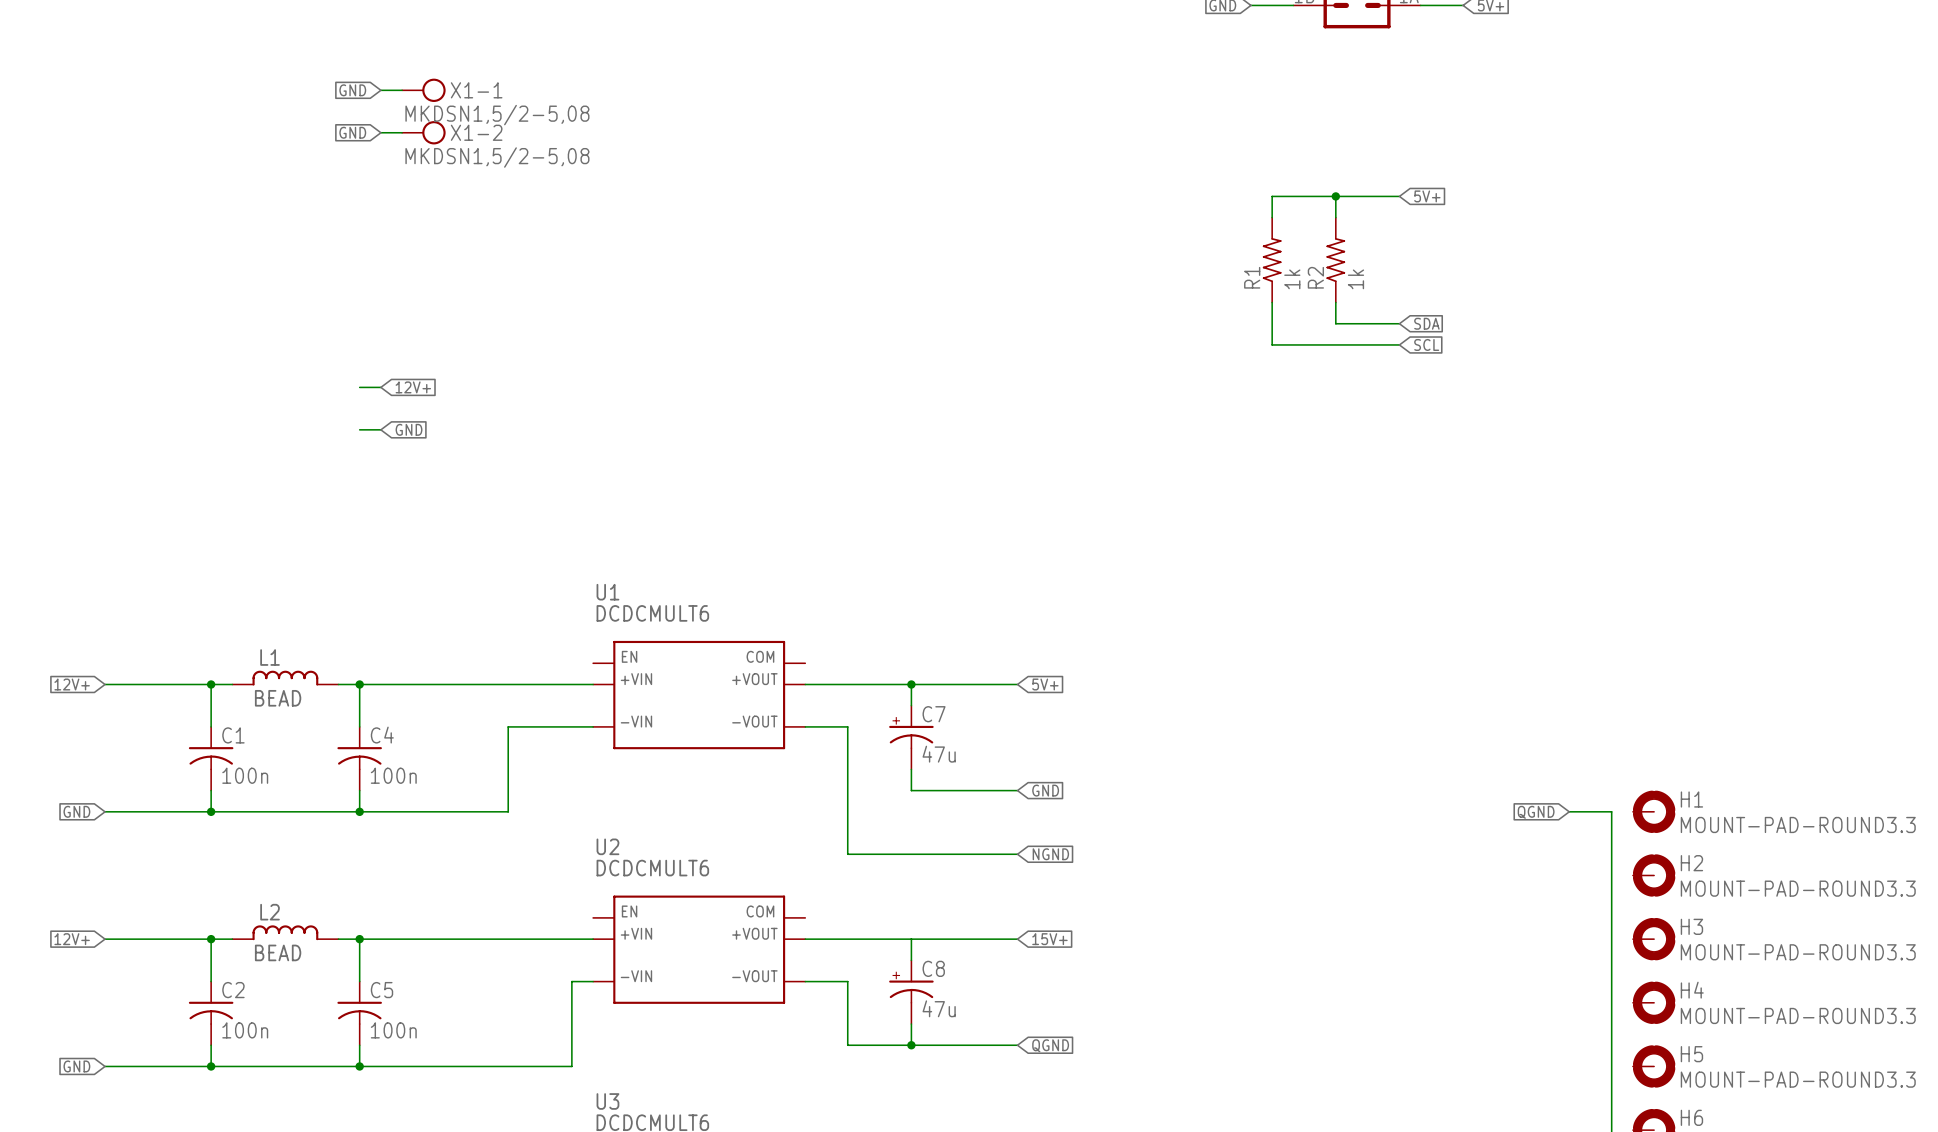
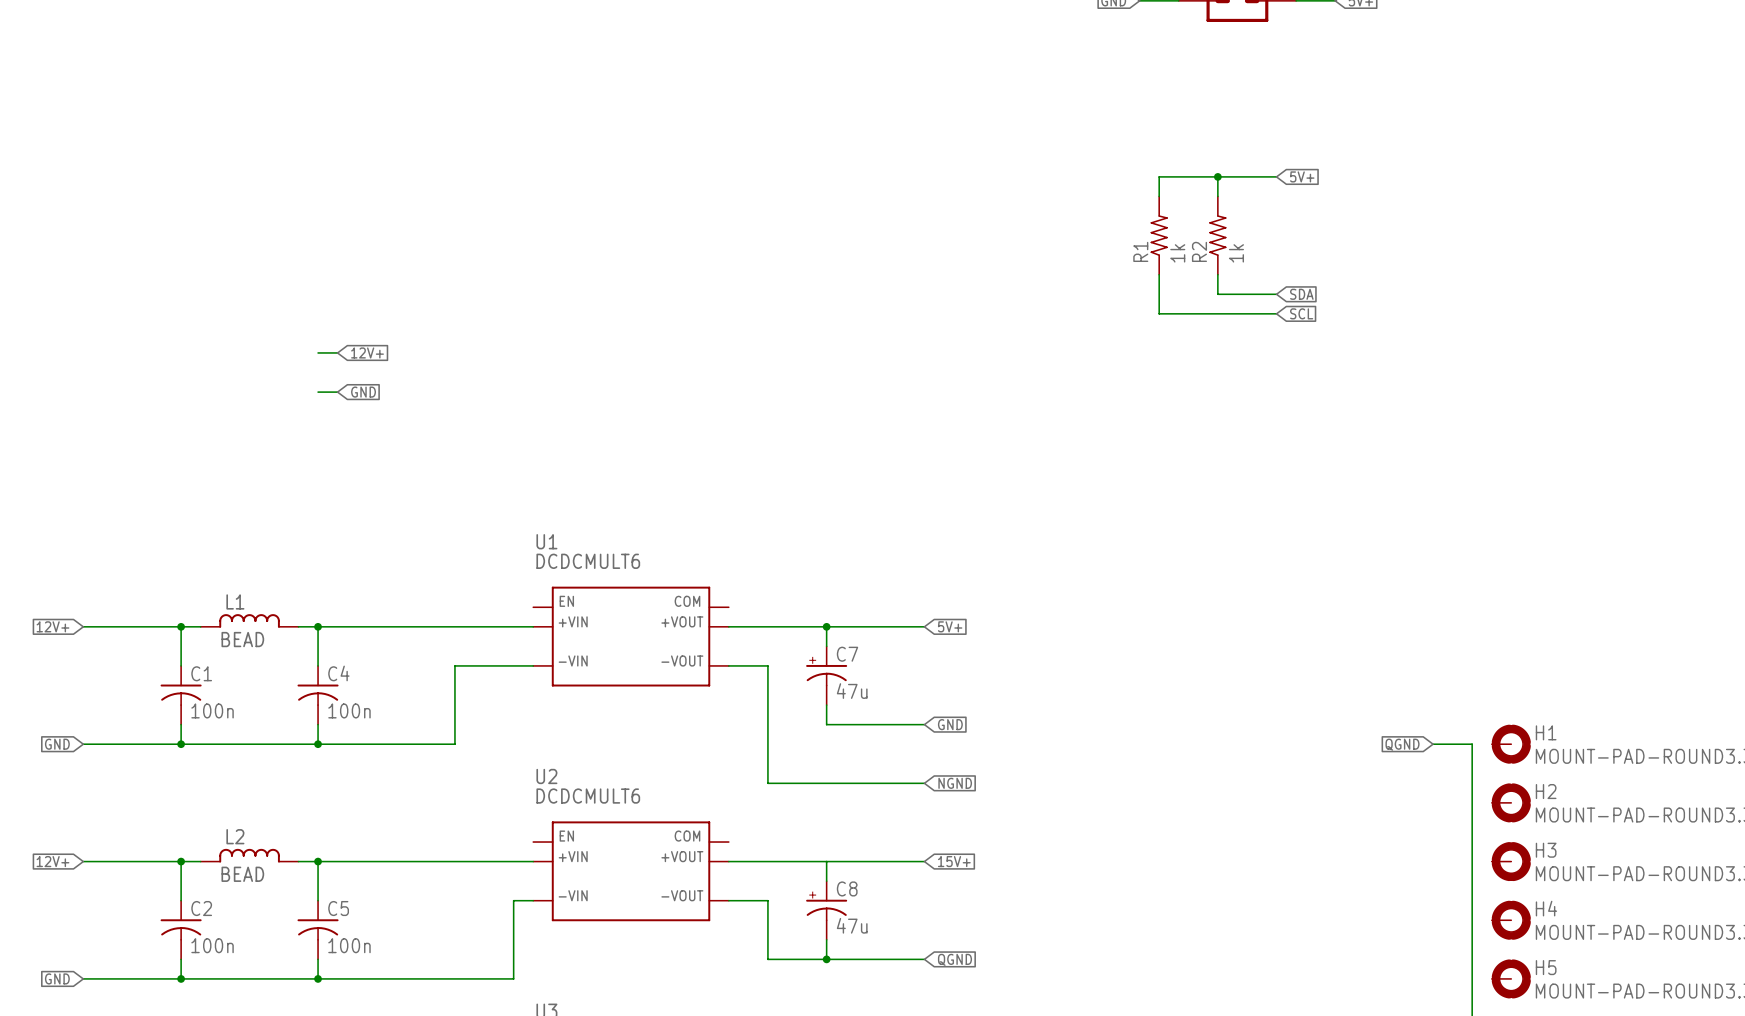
global label: GND (352, 90) -> none
wire: (380, 90) (402, 90) -> none
X1-1: MKDSN1,5/2-5,08 (423, 90) -> none
global label: GND (352, 132) -> none
wire: (380, 132) (402, 132) -> none
X1-2: MKDSN1,5/2-5,08 (423, 132) -> none

